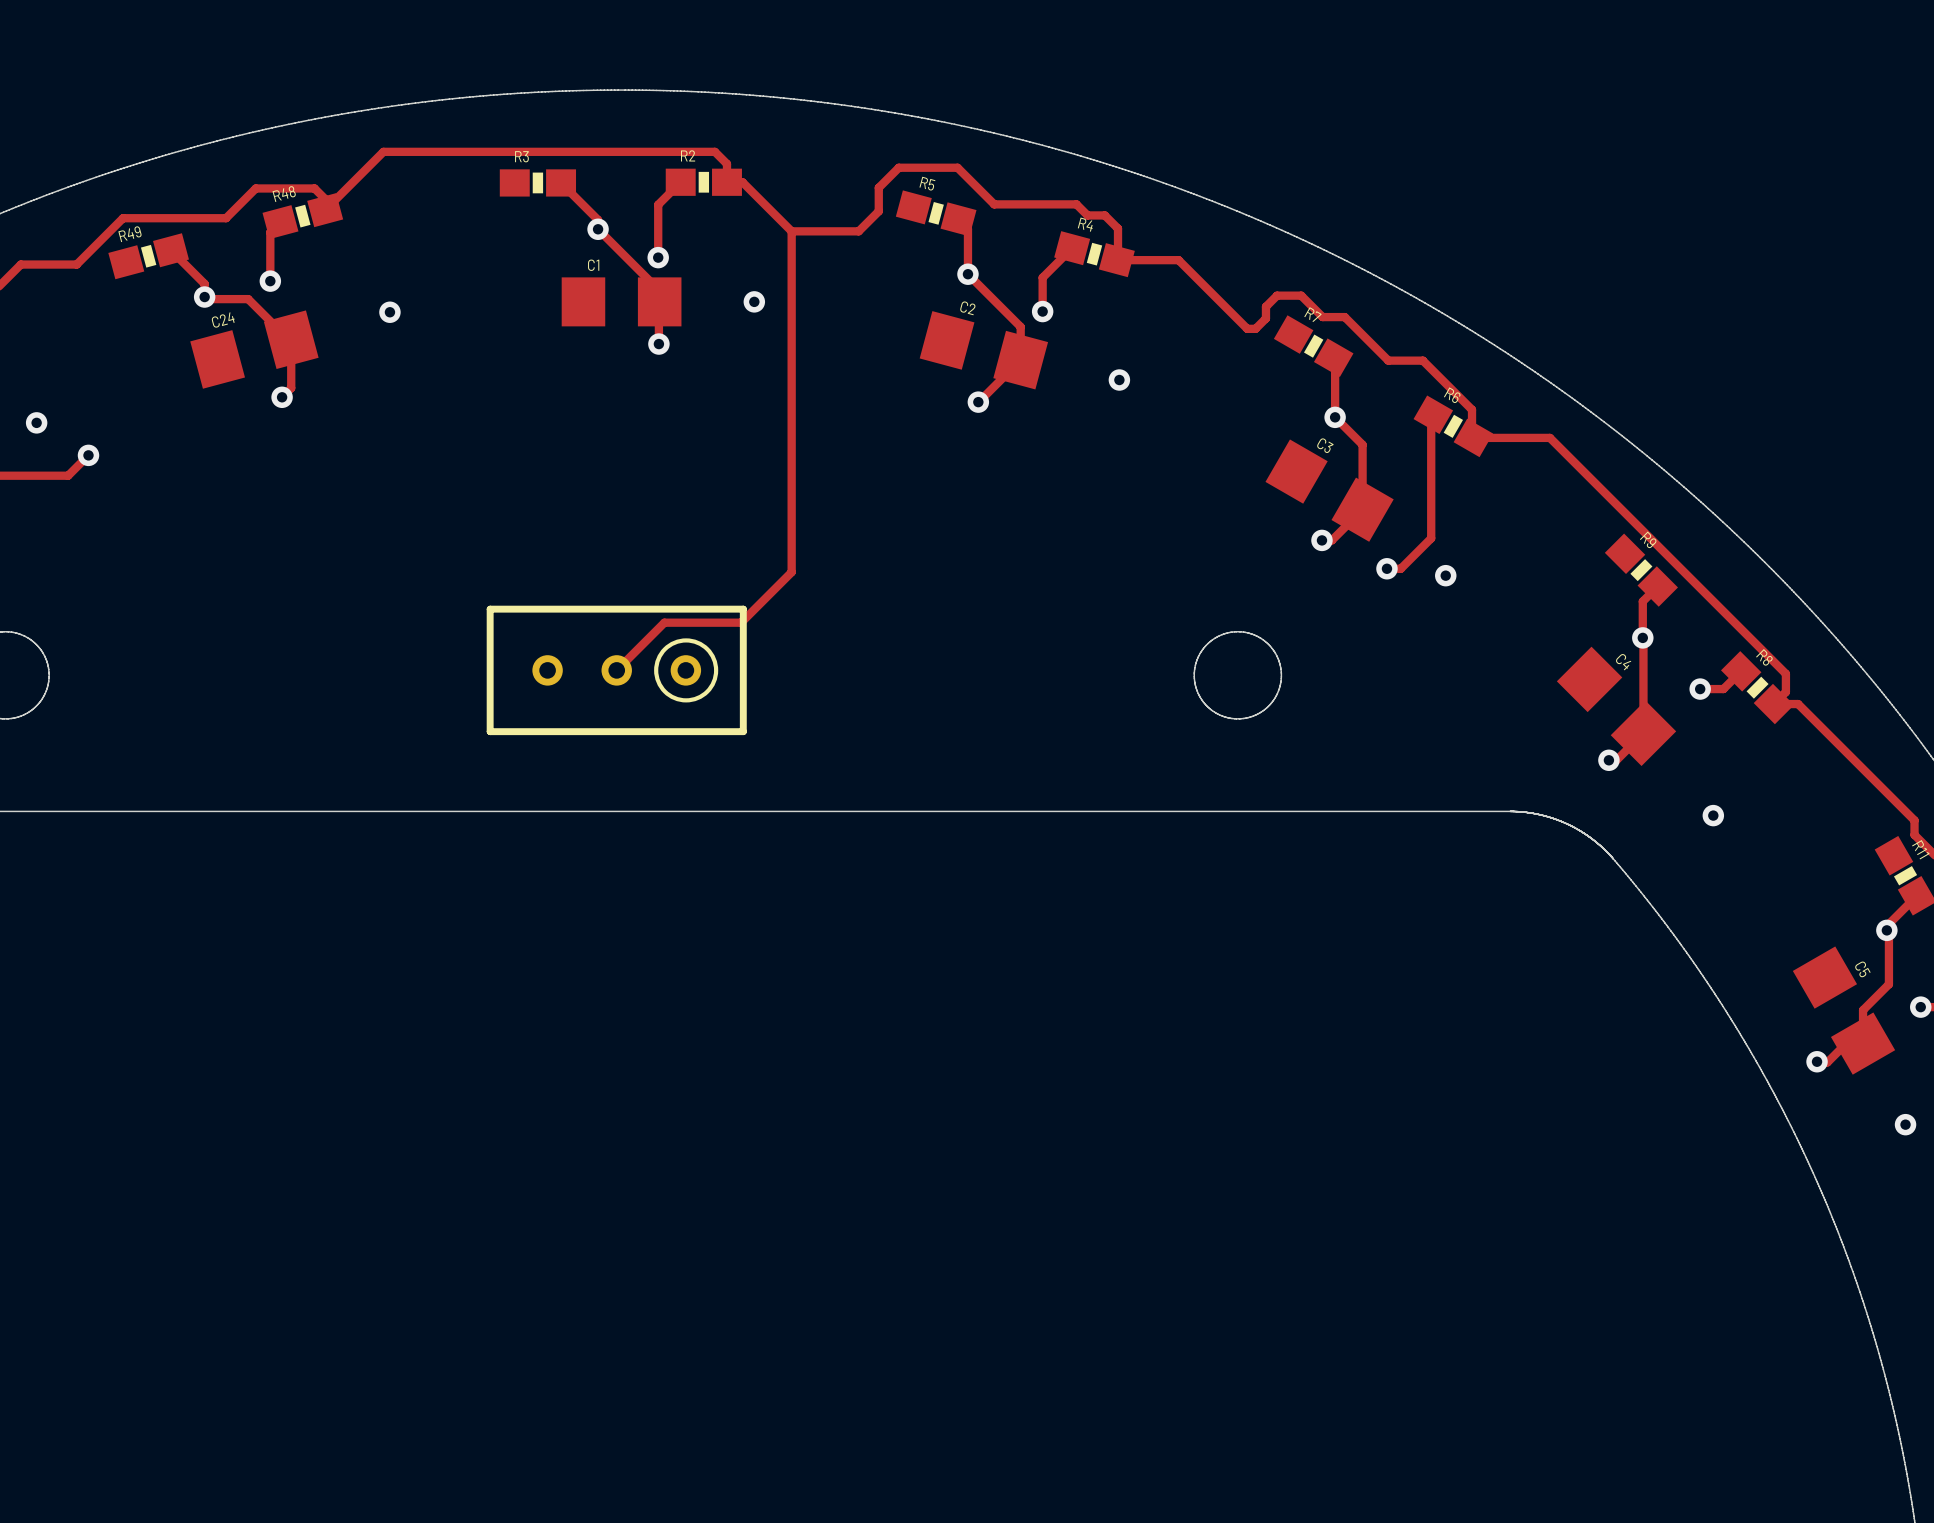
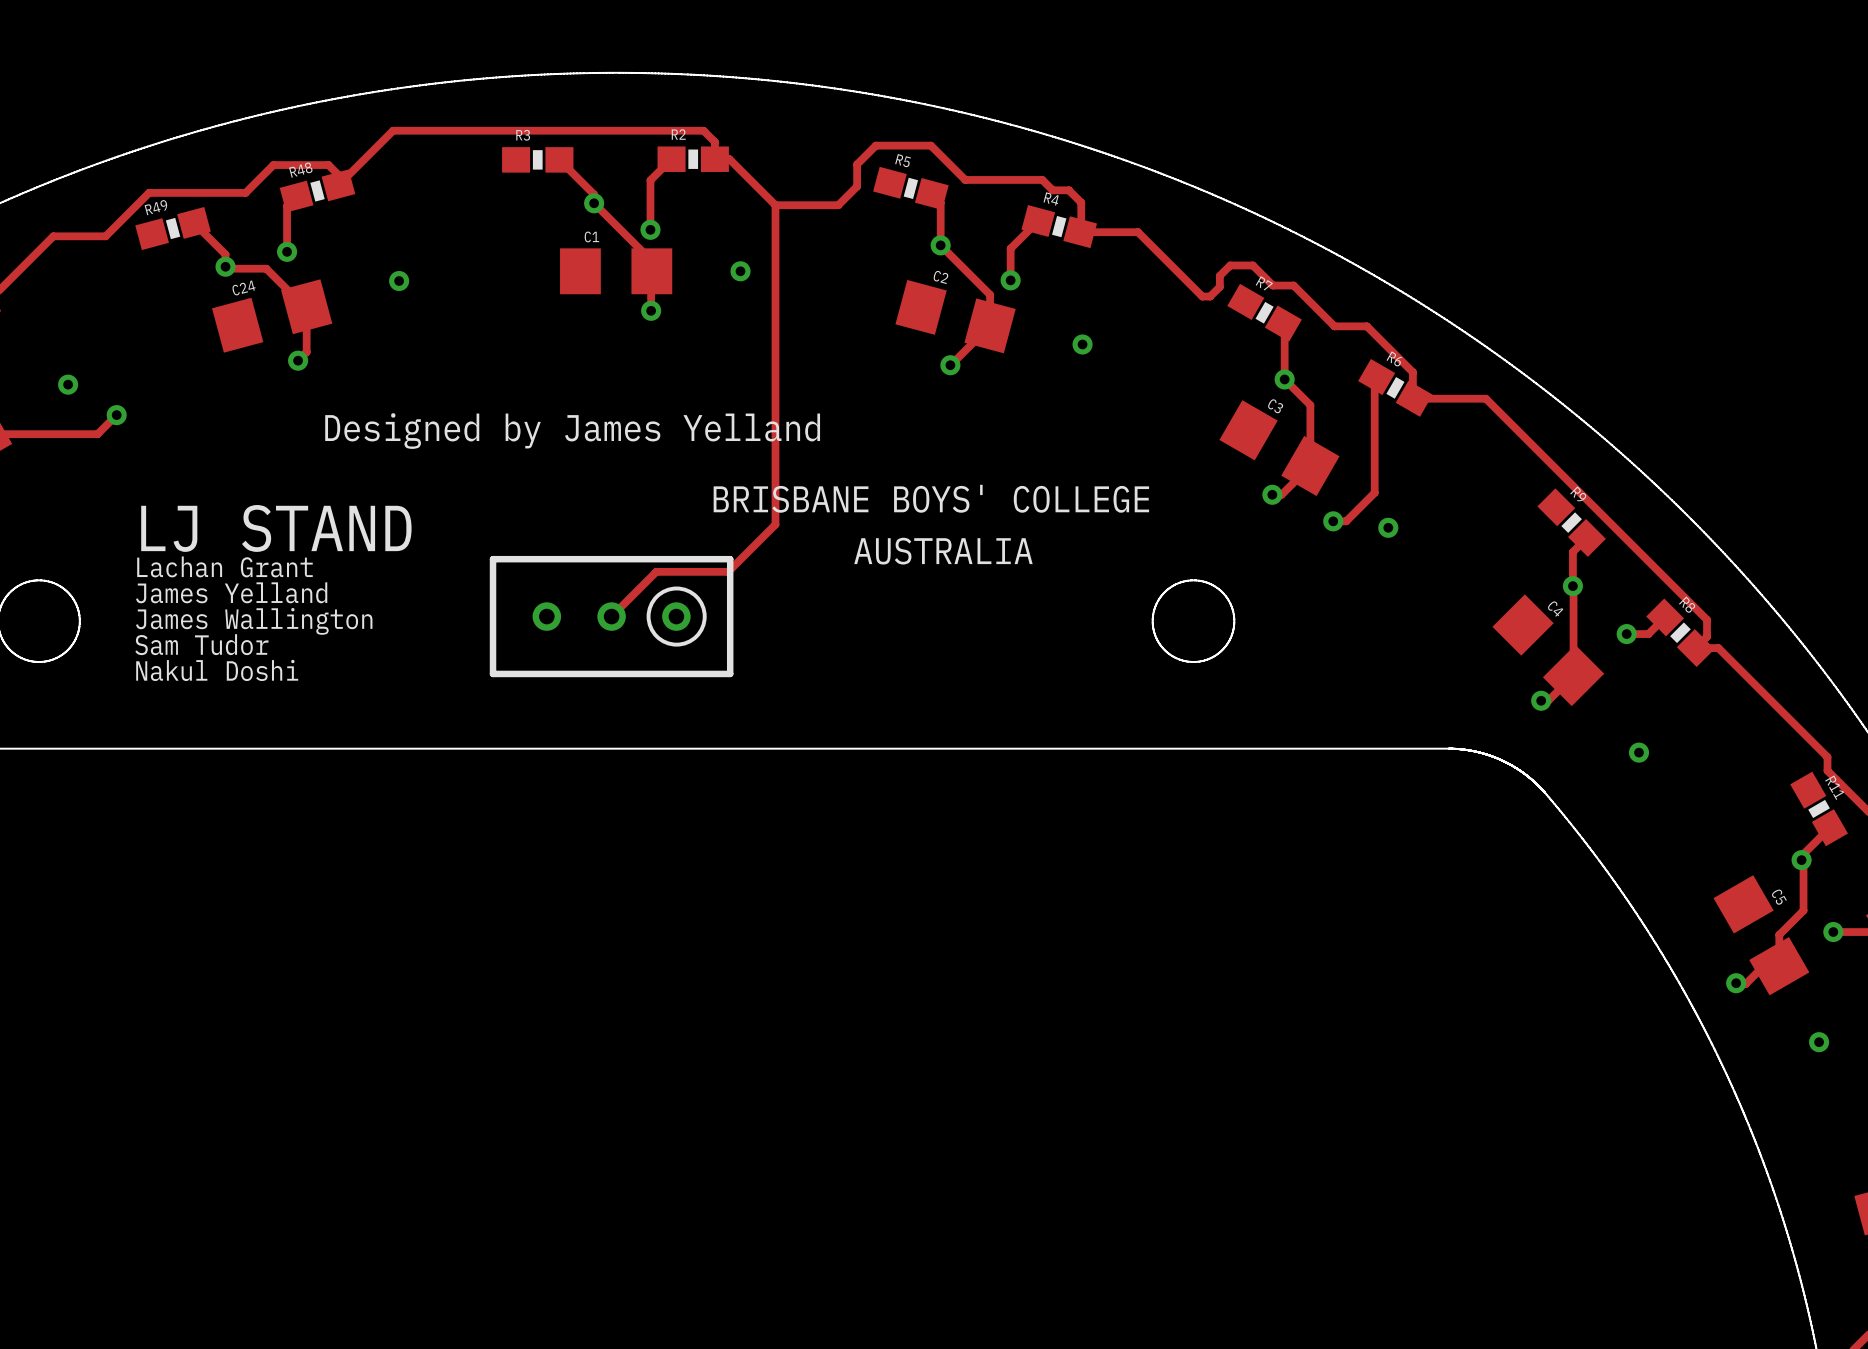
text: none -> Designed by James Yelland (572, 431)
text: none -> BRISBANE BOYS' COLLEGE (931, 498)
text: none -> LJ STAND (276, 528)
text: none -> AUSTRALIA (943, 551)
text: none -> Lachan Grant (224, 566)
text: none -> James Yelland (231, 592)
text: none -> James Wallington (254, 621)
text: none -> Sam Tudor (201, 644)
text: none -> Nakul Doshi (217, 670)

